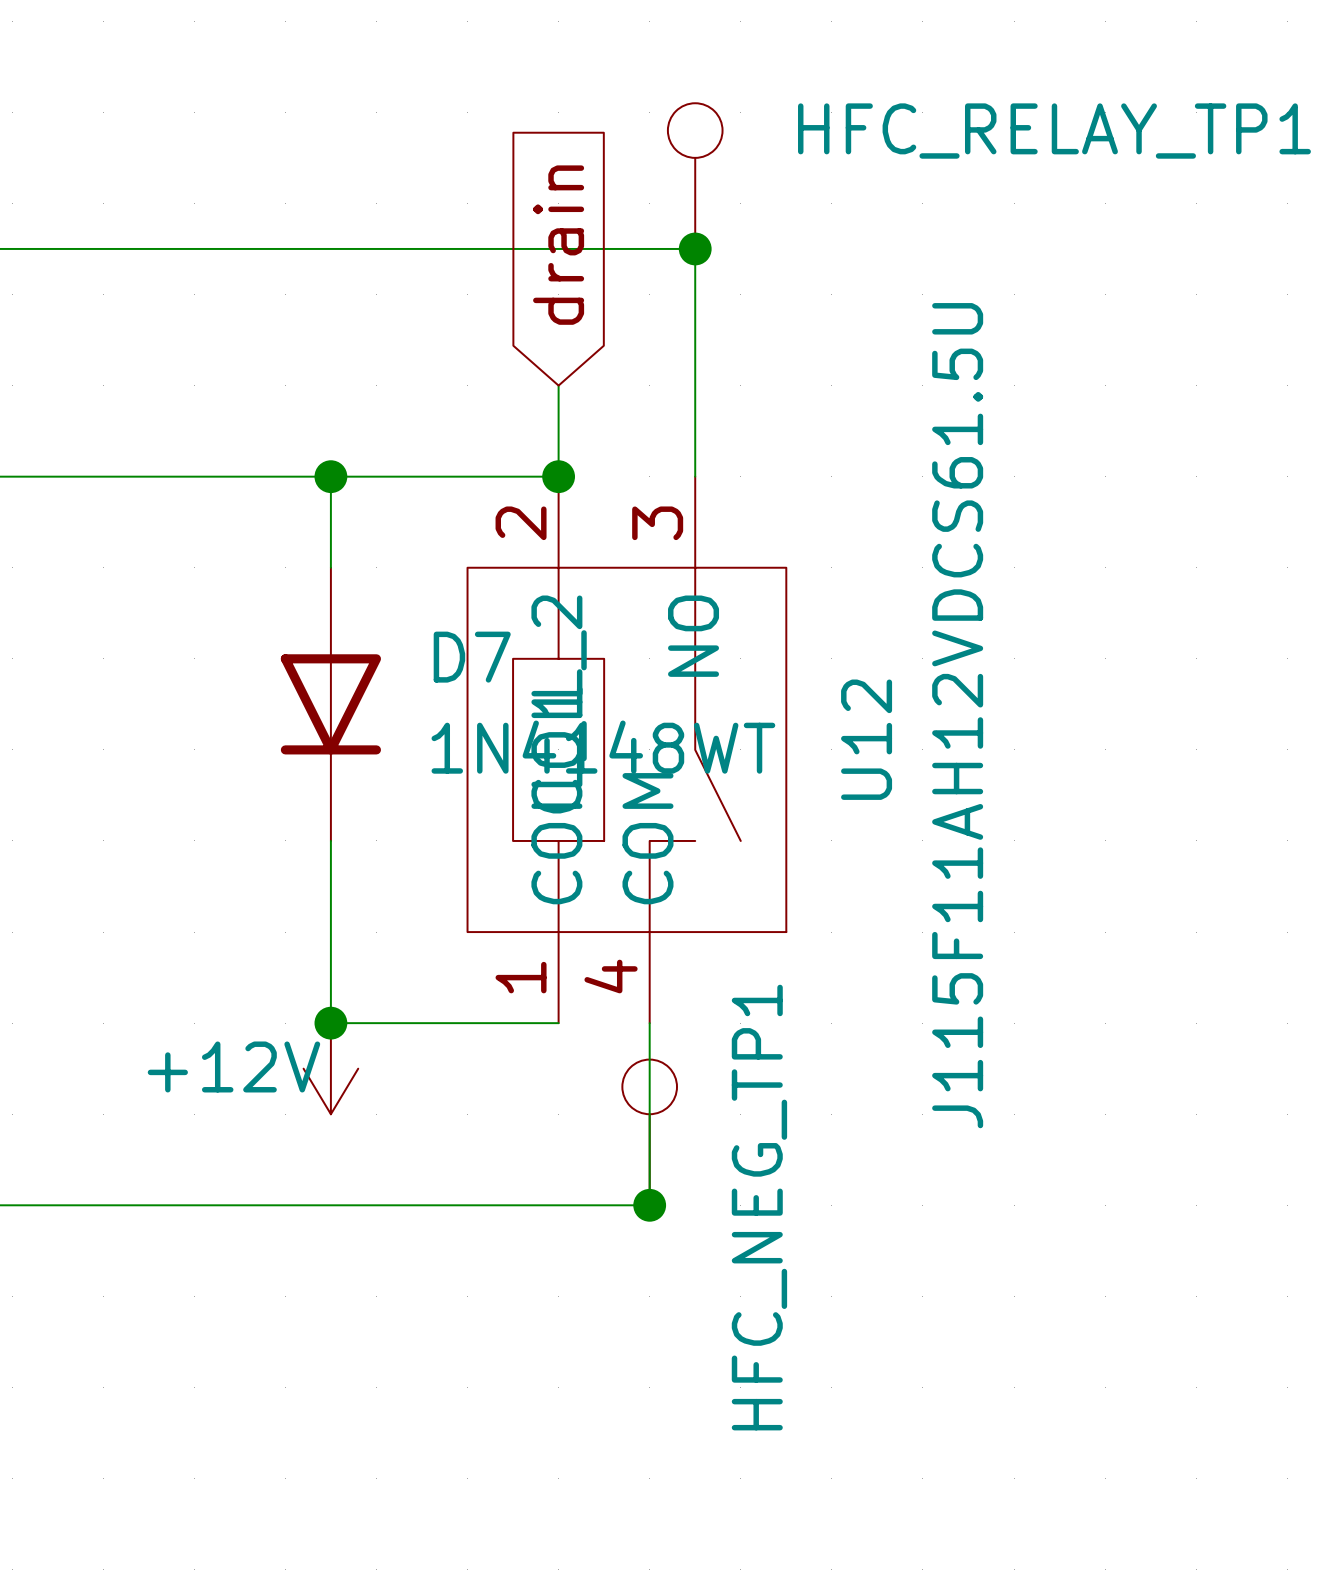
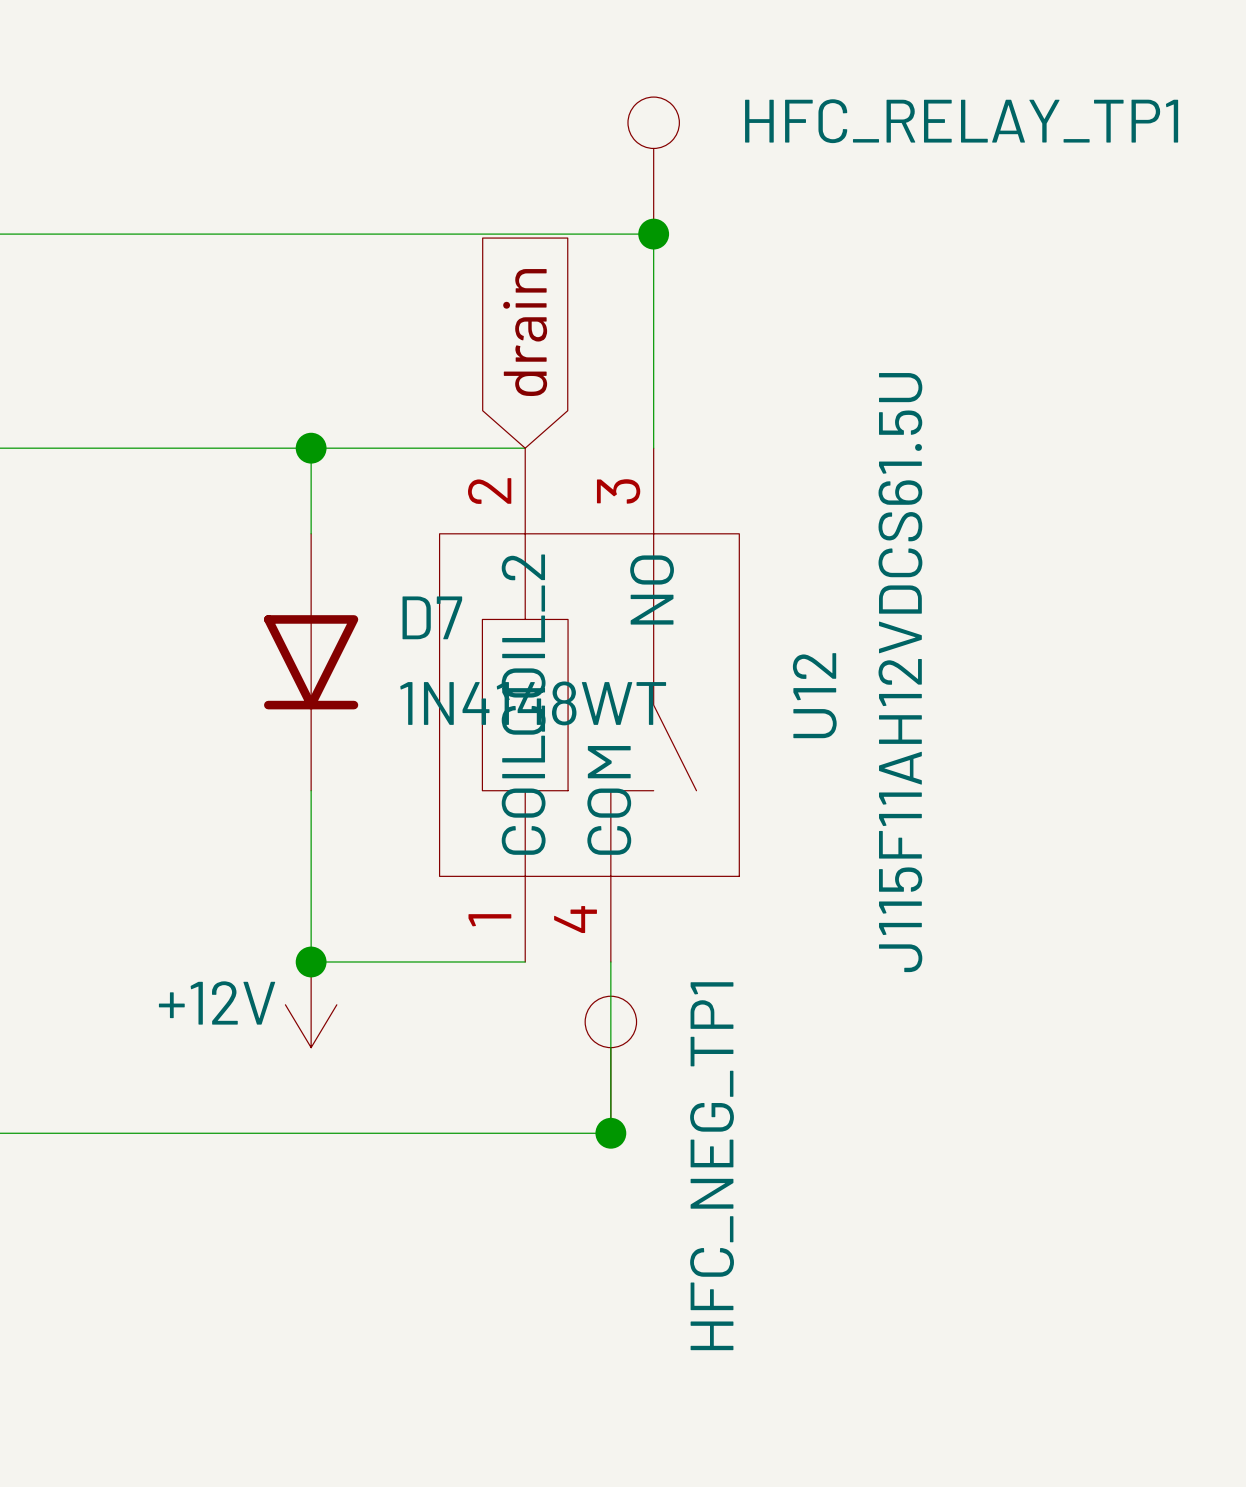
global label position: drain (558, 245) -> drain (525, 332)
wire: (558, 385) (558, 476) -> none
junction: (558, 476) -> none

